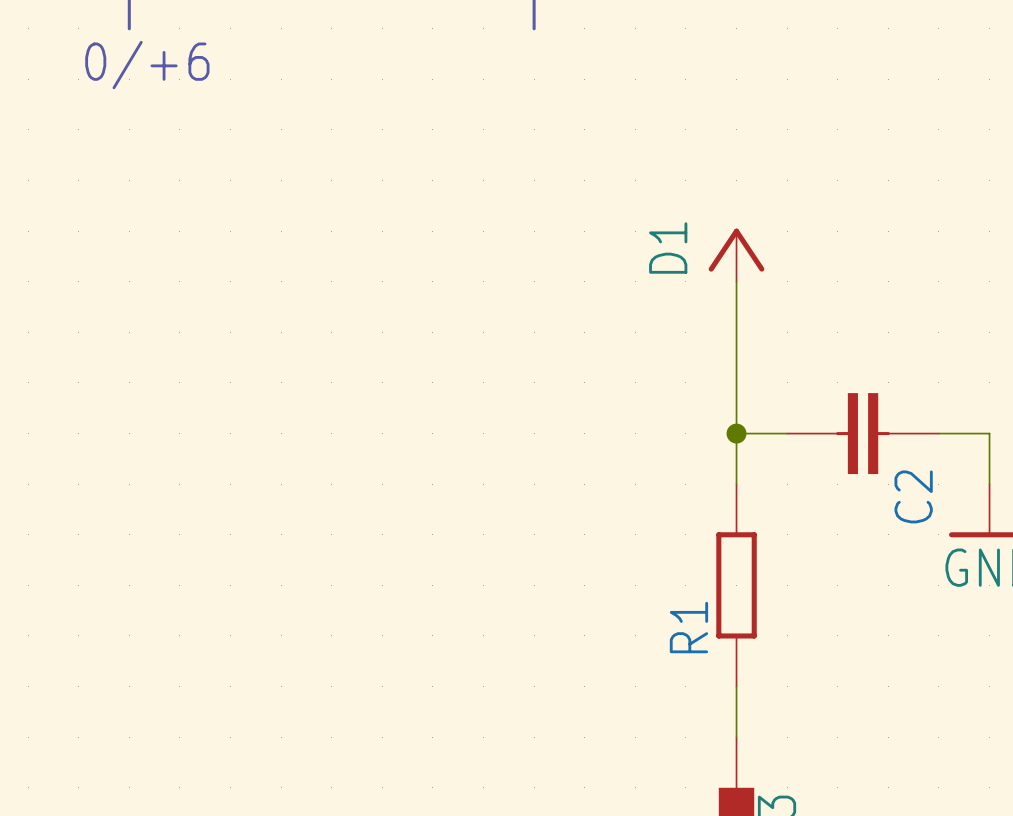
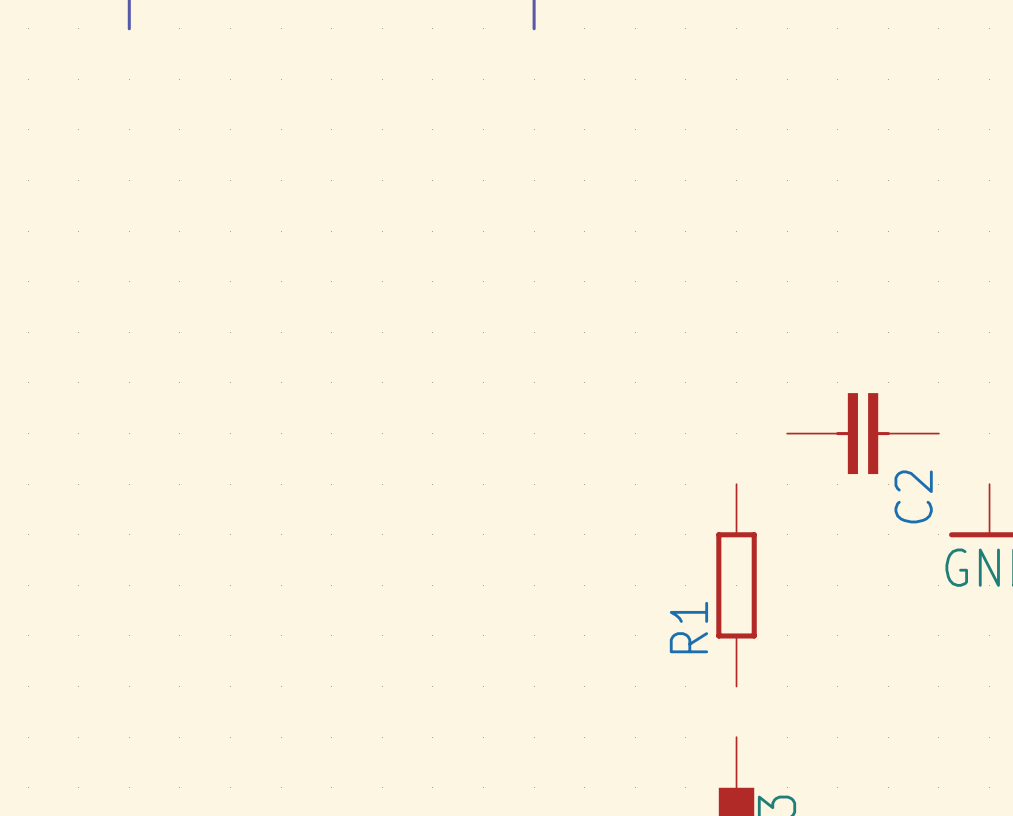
text: 0/+6 (147, 65) -> none
power symbol: D1 (736, 255) -> none
wire: (736, 281) (736, 484) -> none
wire: (736, 433) (787, 433) -> none
junction: (736, 433) -> none
wire: (938, 433) (989, 433) (989, 484) -> none
wire: (736, 686) (736, 737) -> none

